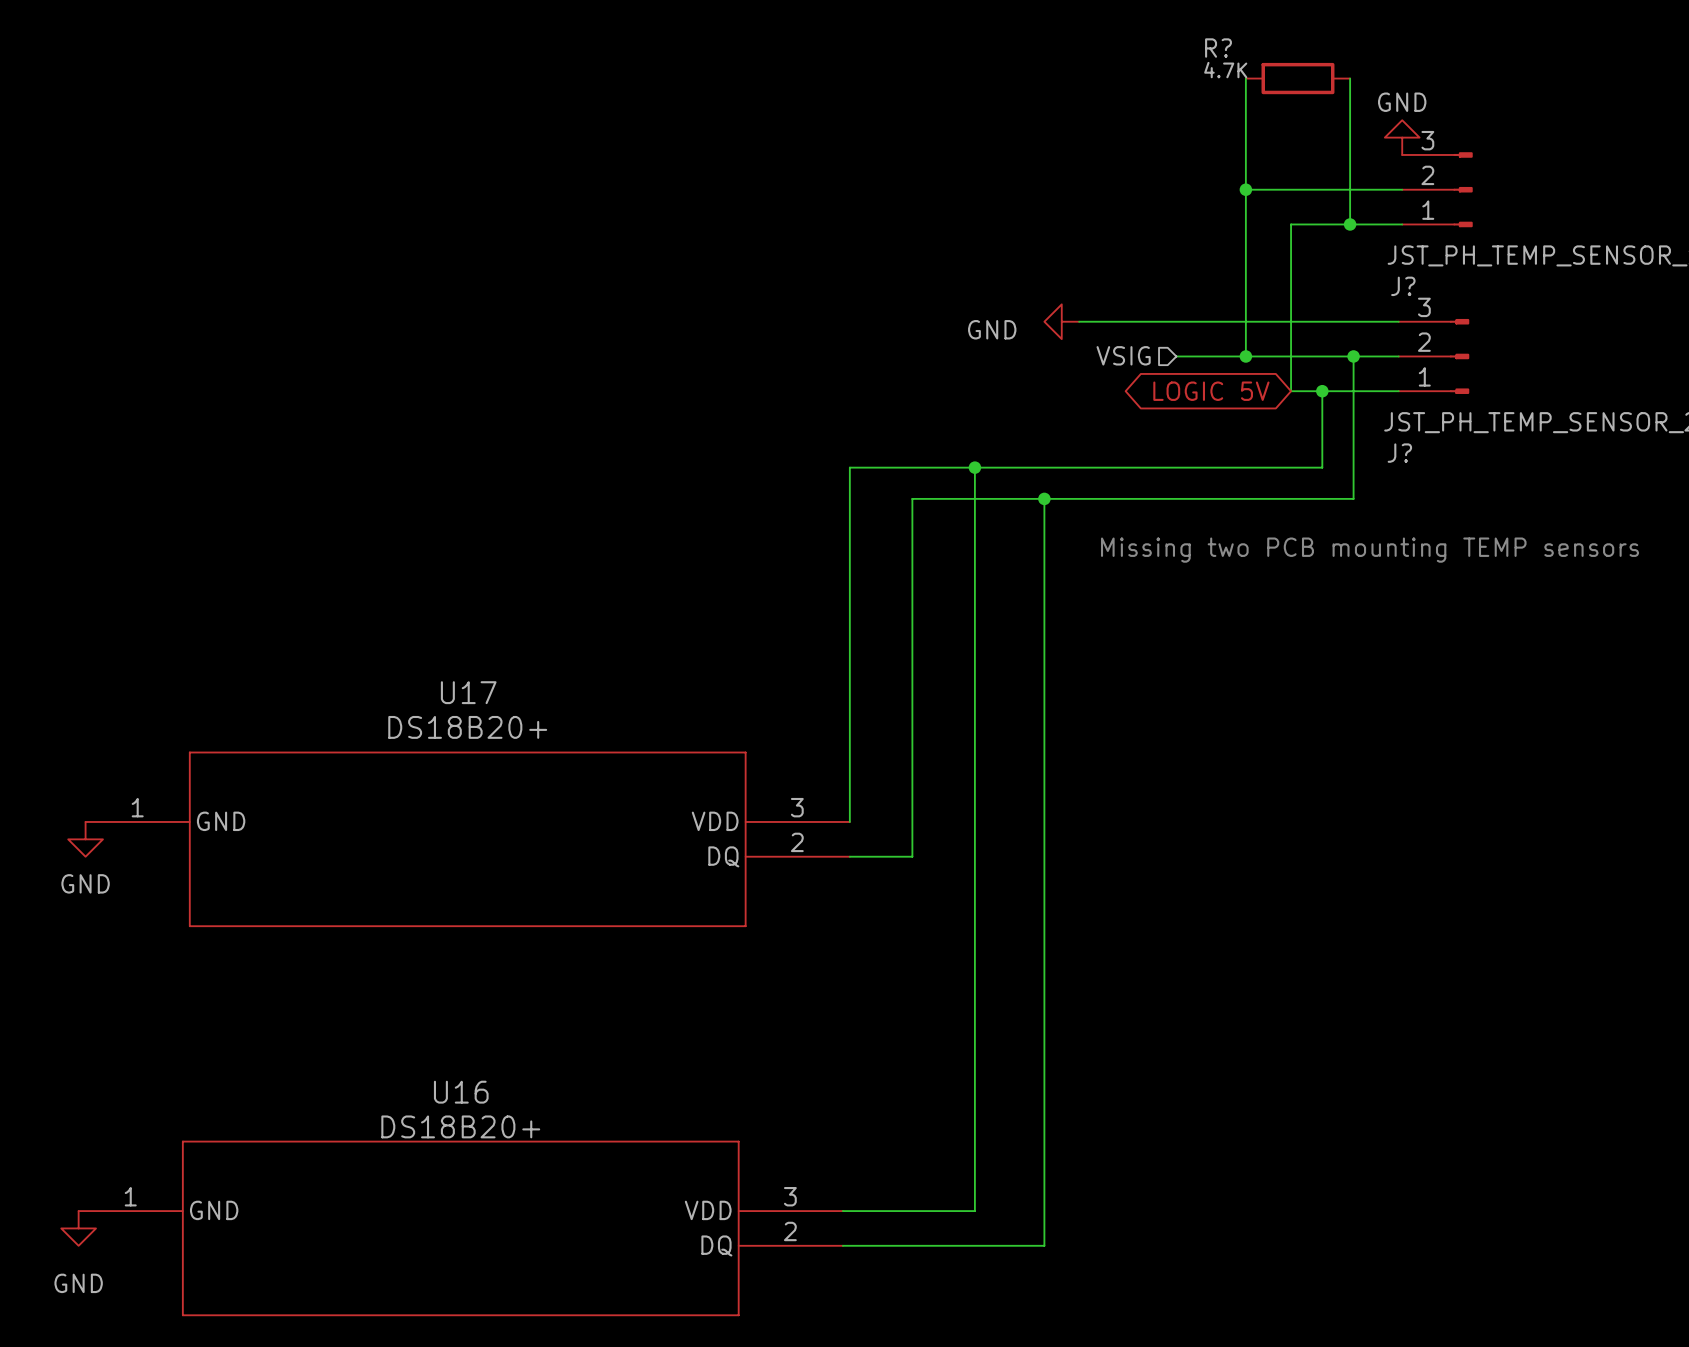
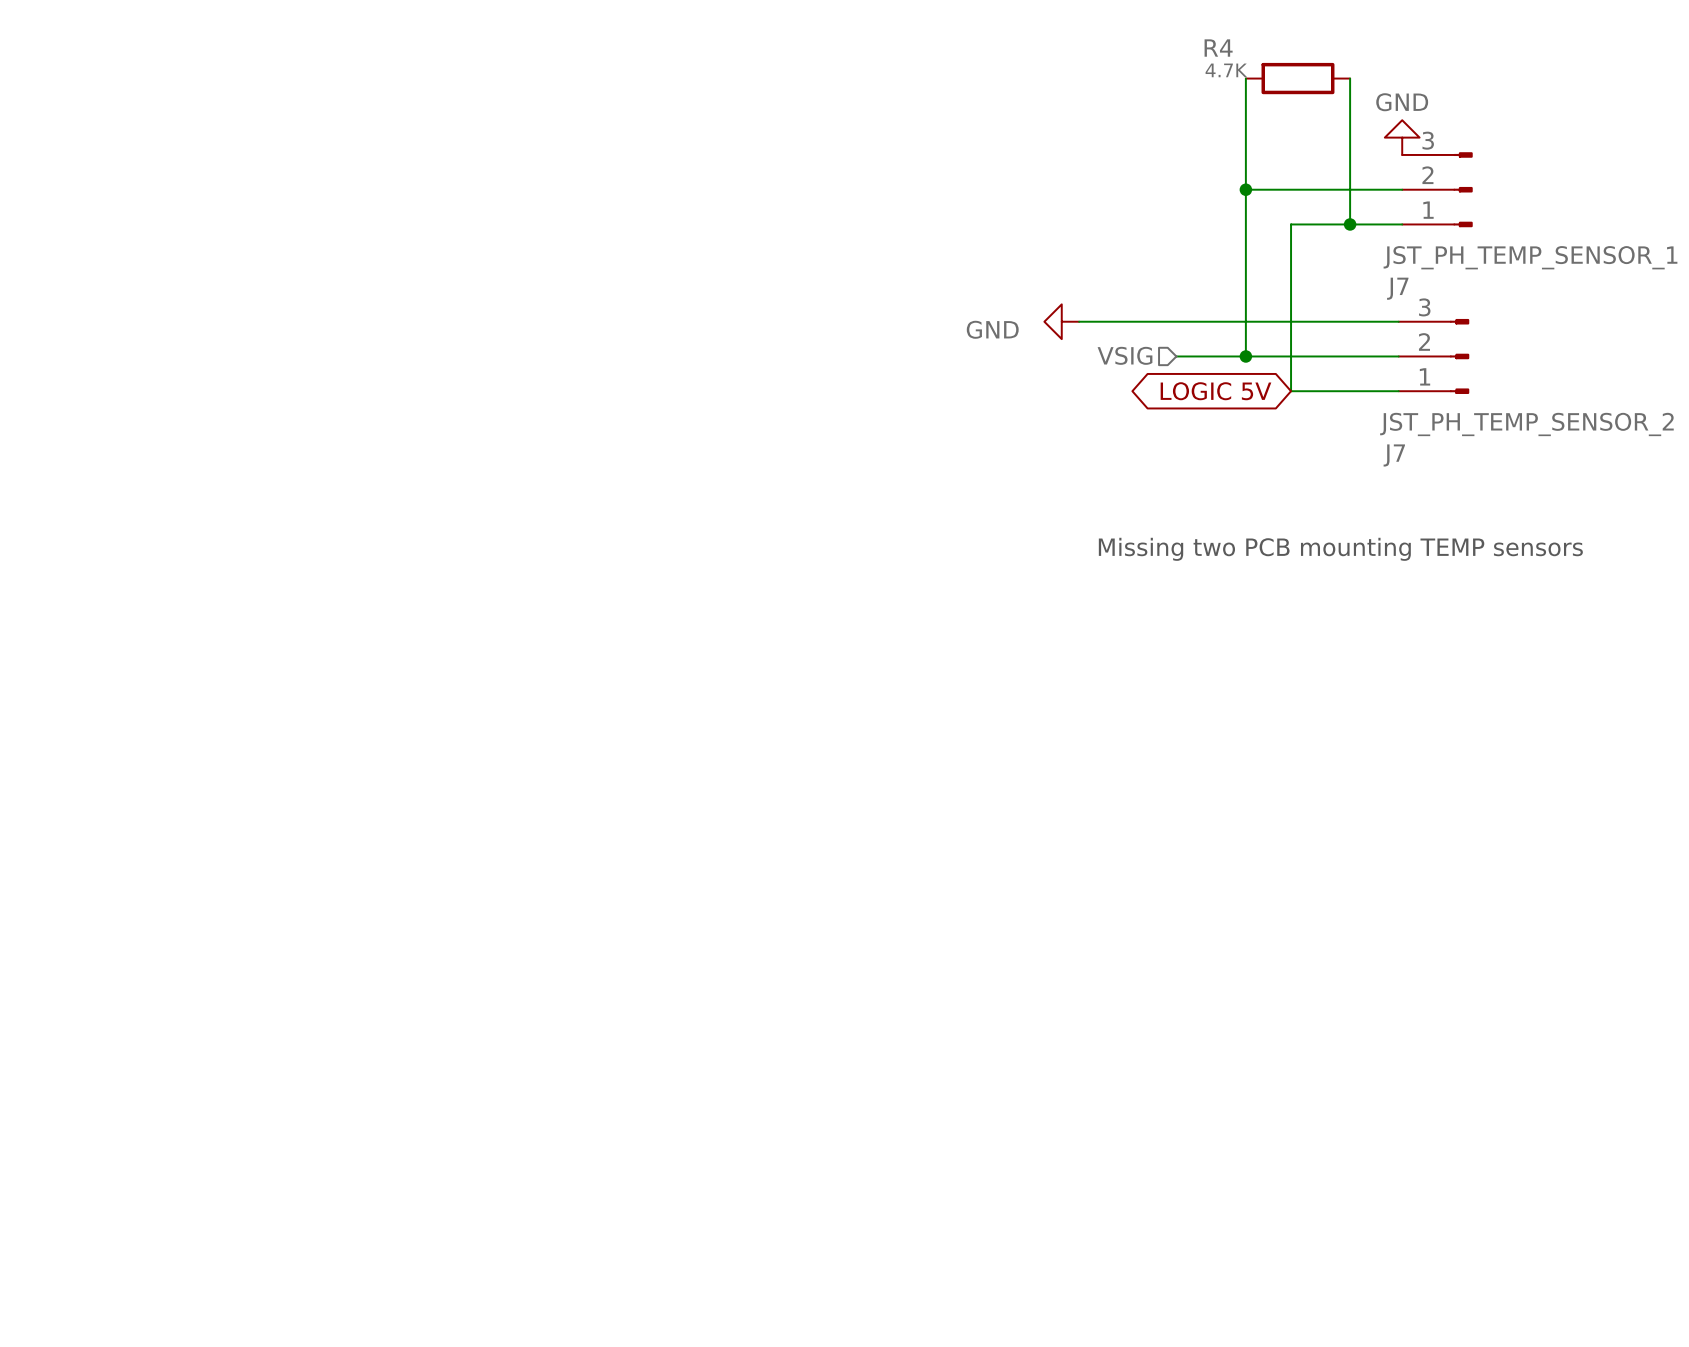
R? name: R? (1218, 48) -> R4 (1218, 48)
J? name: J? (1403, 286) -> J7 (1397, 288)
wire: (1353, 356) (1353, 498) (912, 498) (912, 856) (849, 856) -> none
junction: (1353, 356) -> none
wire: (1322, 391) (1322, 467) (849, 467) (849, 821) -> none
junction: (1322, 391) -> none
J? name: J? (1399, 453) -> J7 (1394, 455)
wire: (974, 467) (974, 1211) (842, 1211) -> none
junction: (974, 467) -> none
wire: (1044, 498) (1044, 1245) (842, 1245) -> none
junction: (1044, 498) -> none
power symbol: GND (85, 839) -> none
U17: DS18B20+ (467, 839) -> none
power symbol: GND (78, 1228) -> none
U16: DS18B20+ (460, 1228) -> none

